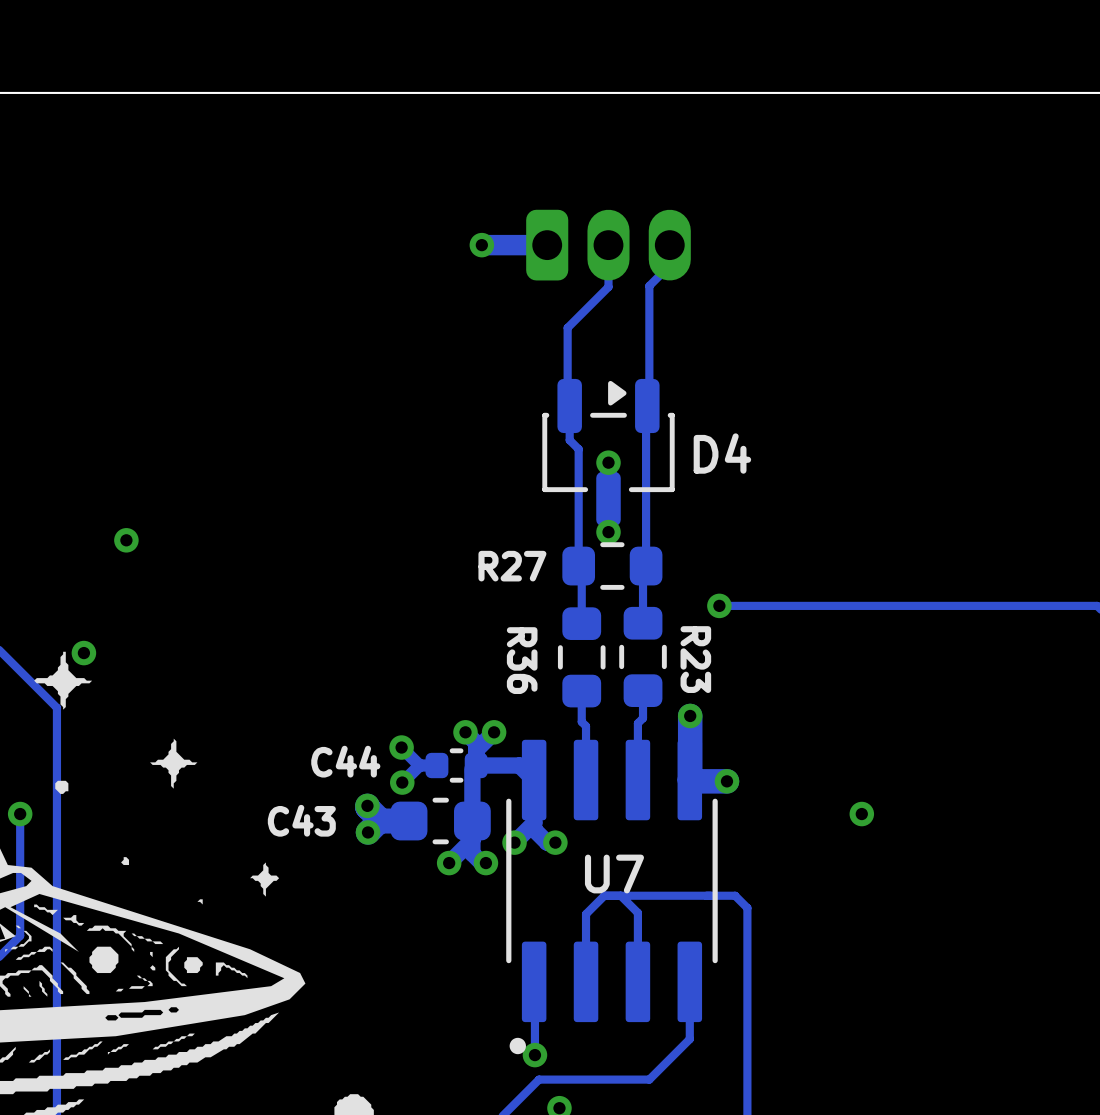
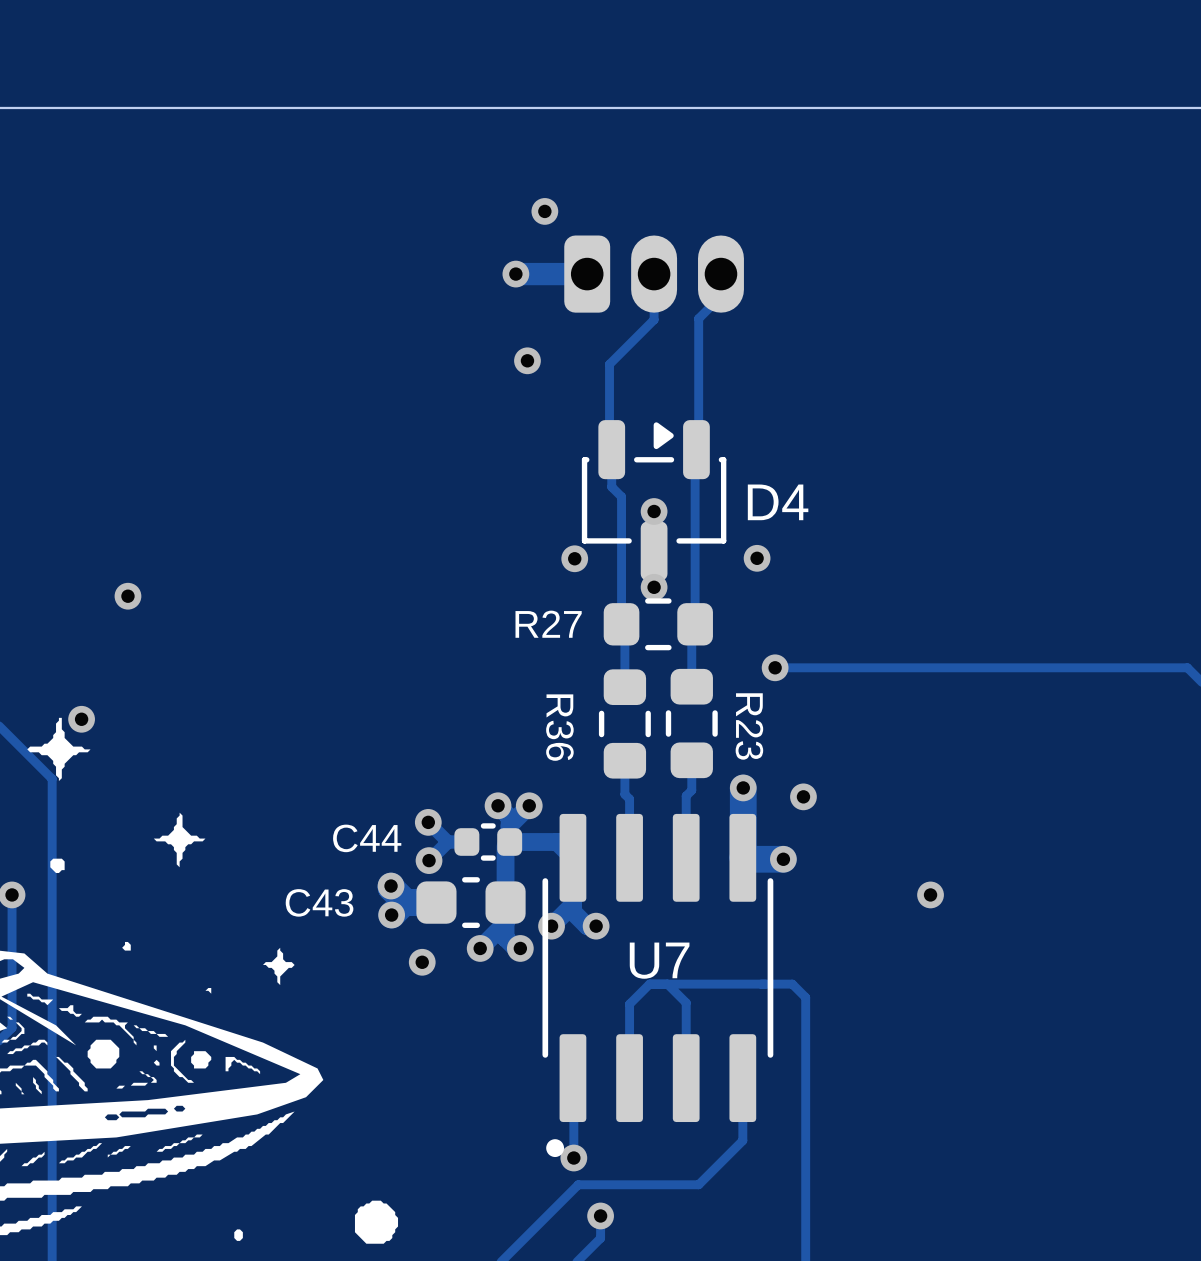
via: none -> (544, 211)
via: none -> (527, 360)
via: none -> (574, 558)
via: none -> (757, 558)
via: none -> (803, 796)
via: none -> (422, 962)

